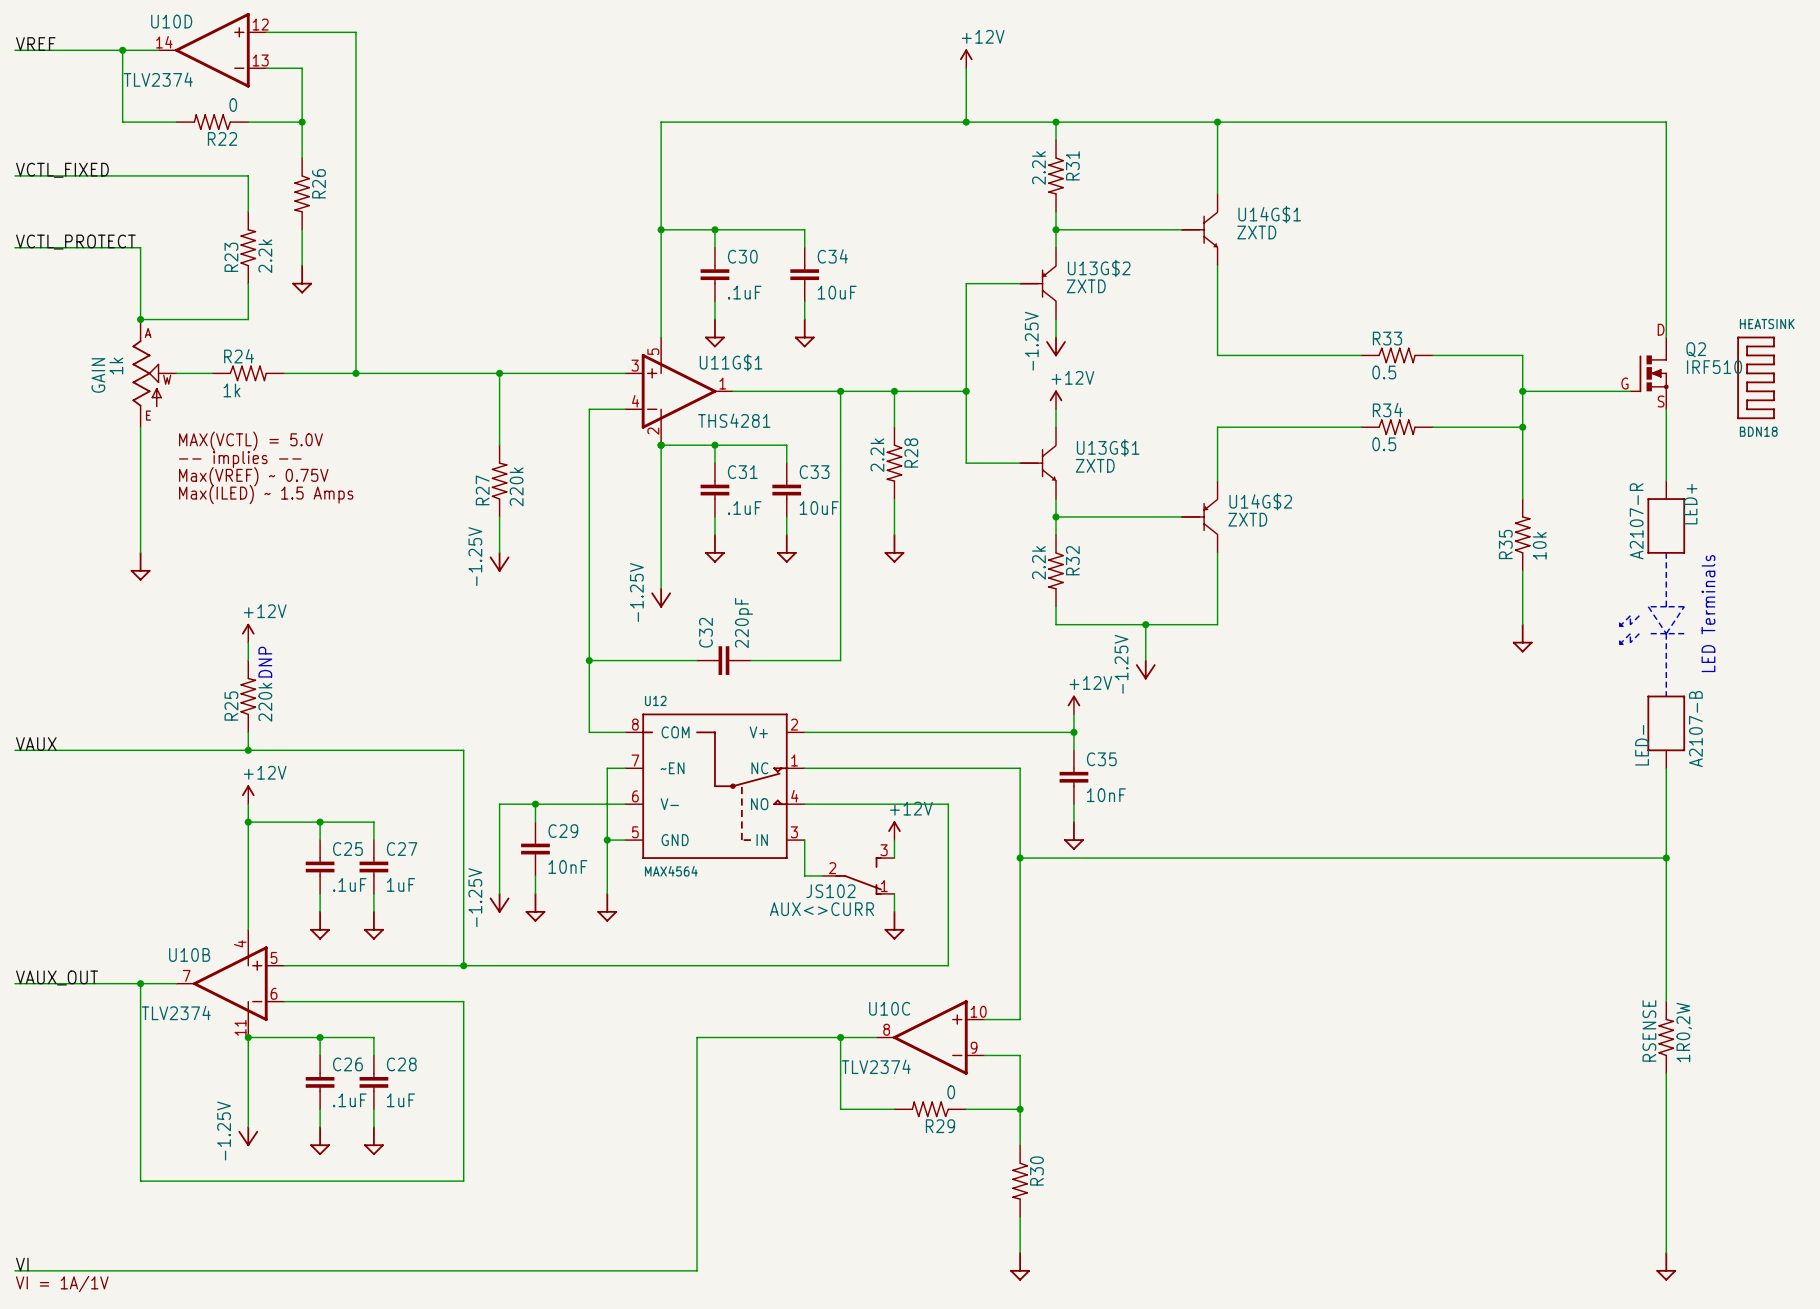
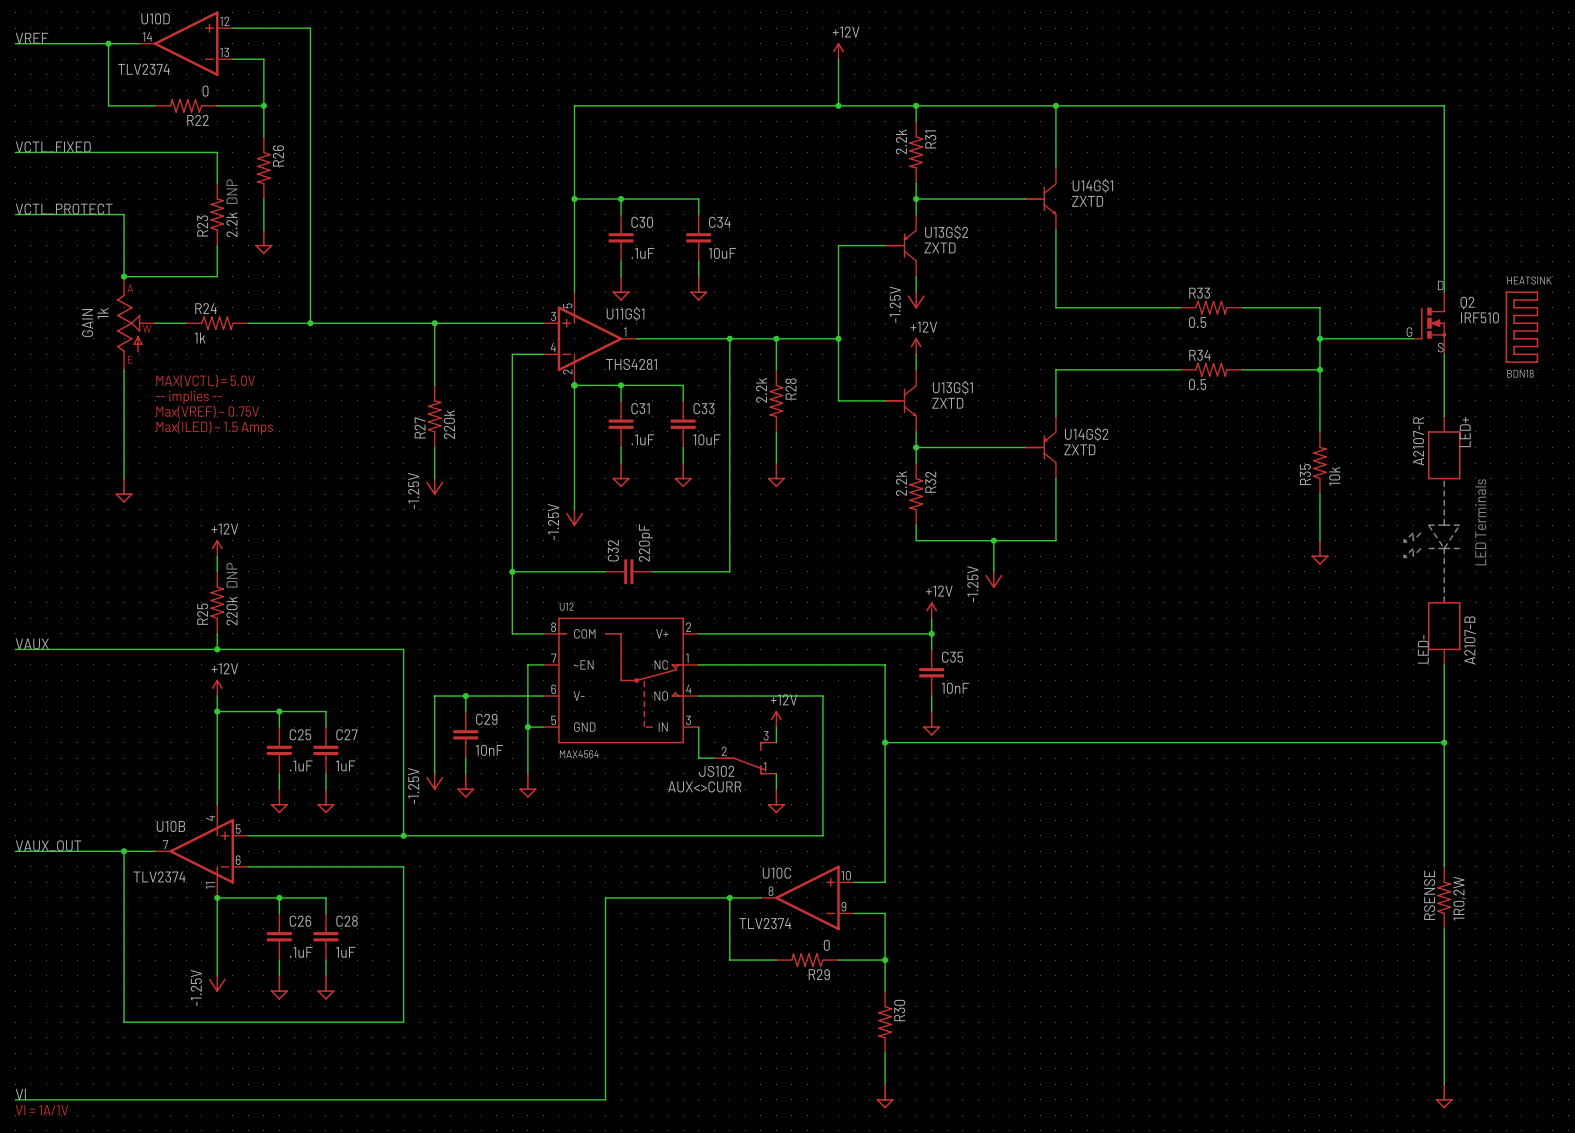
text: none -> DNP (232, 191)

